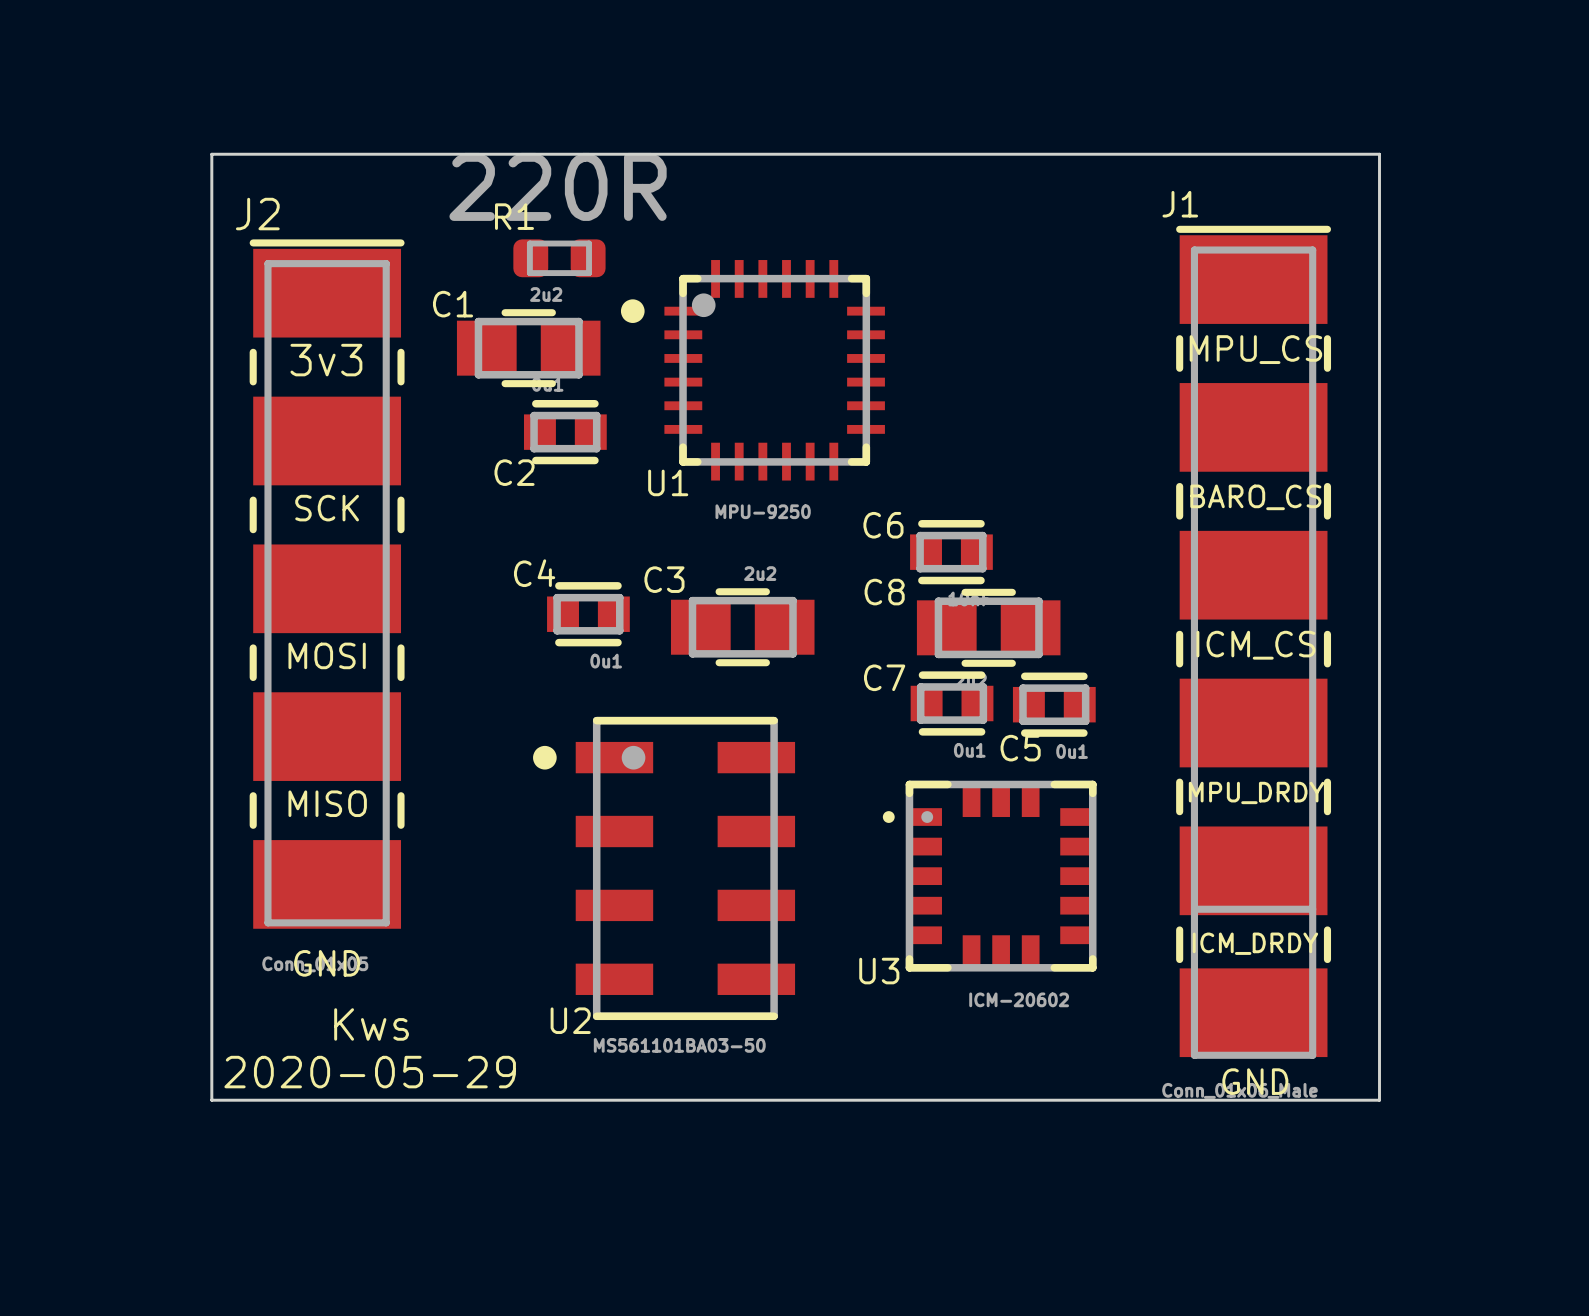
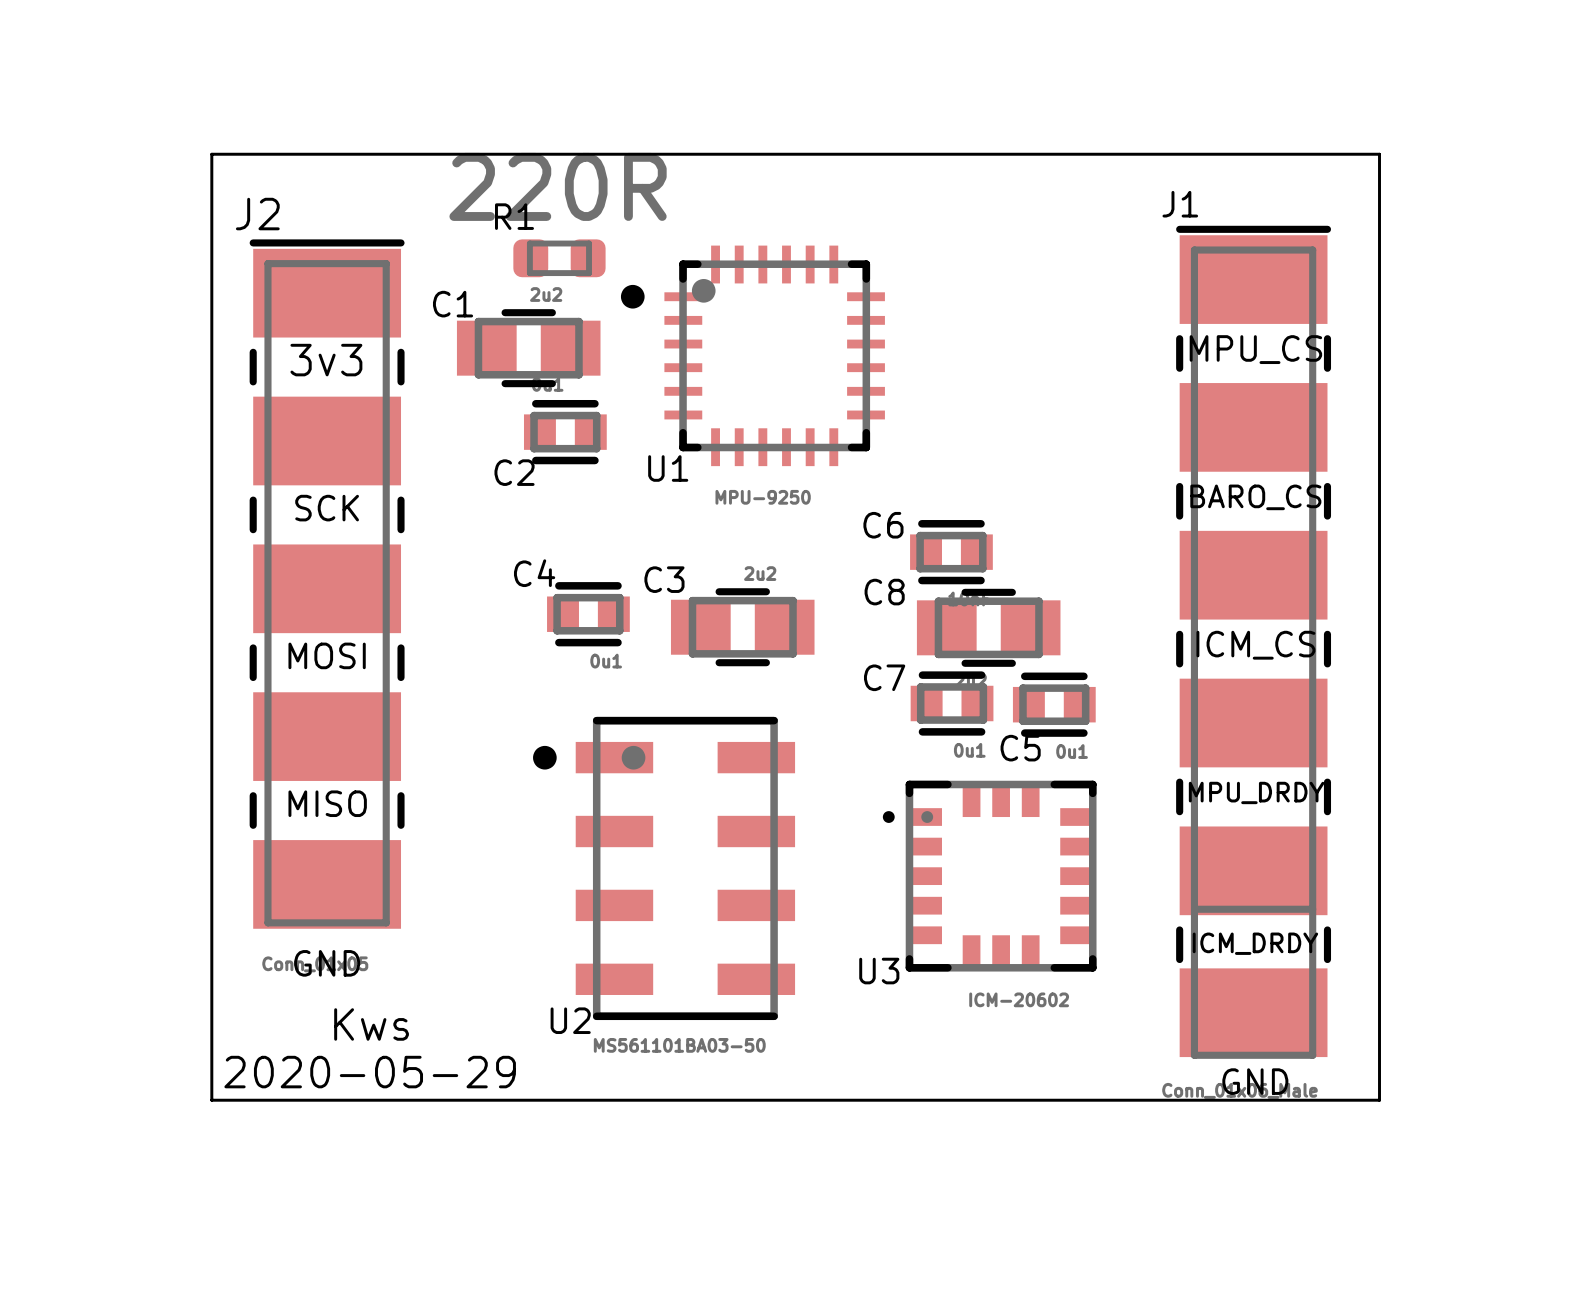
U1 position: (752, 370) -> (752, 355)

